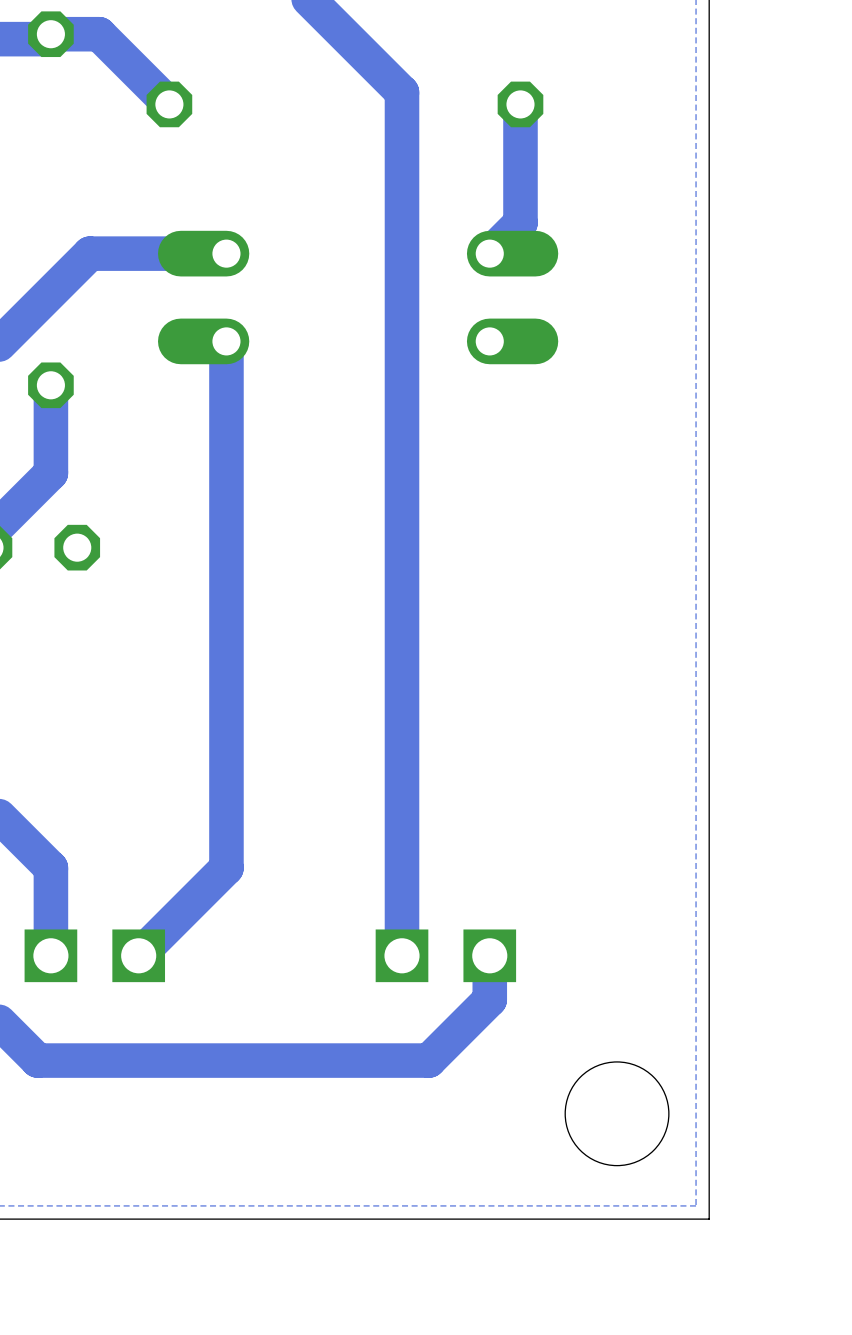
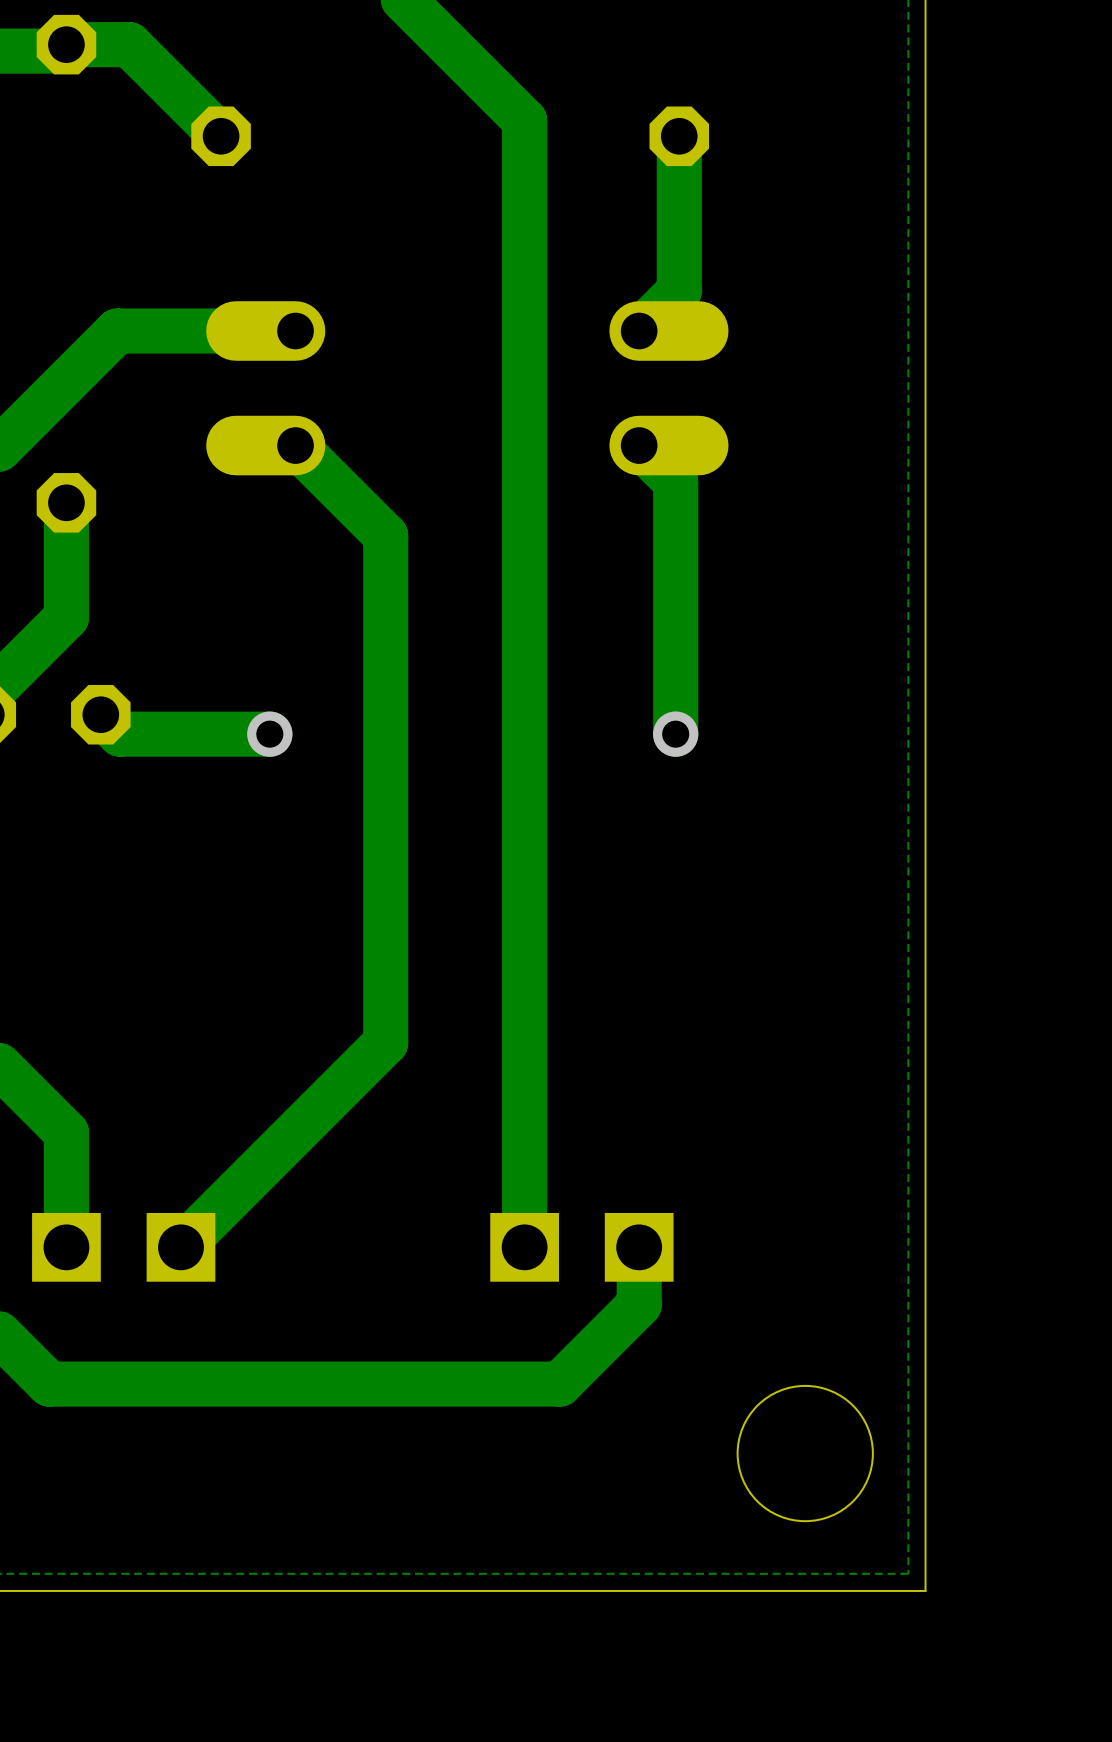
track: (226, 341) (226, 868) -> (295, 445) (385, 535) (385, 1042) (295, 1132)
track: none -> (639, 445) (675, 482) (675, 734)
track: none -> (100, 714) (120, 734) (269, 734)
via: none -> (269, 734)
via: none -> (675, 734)

